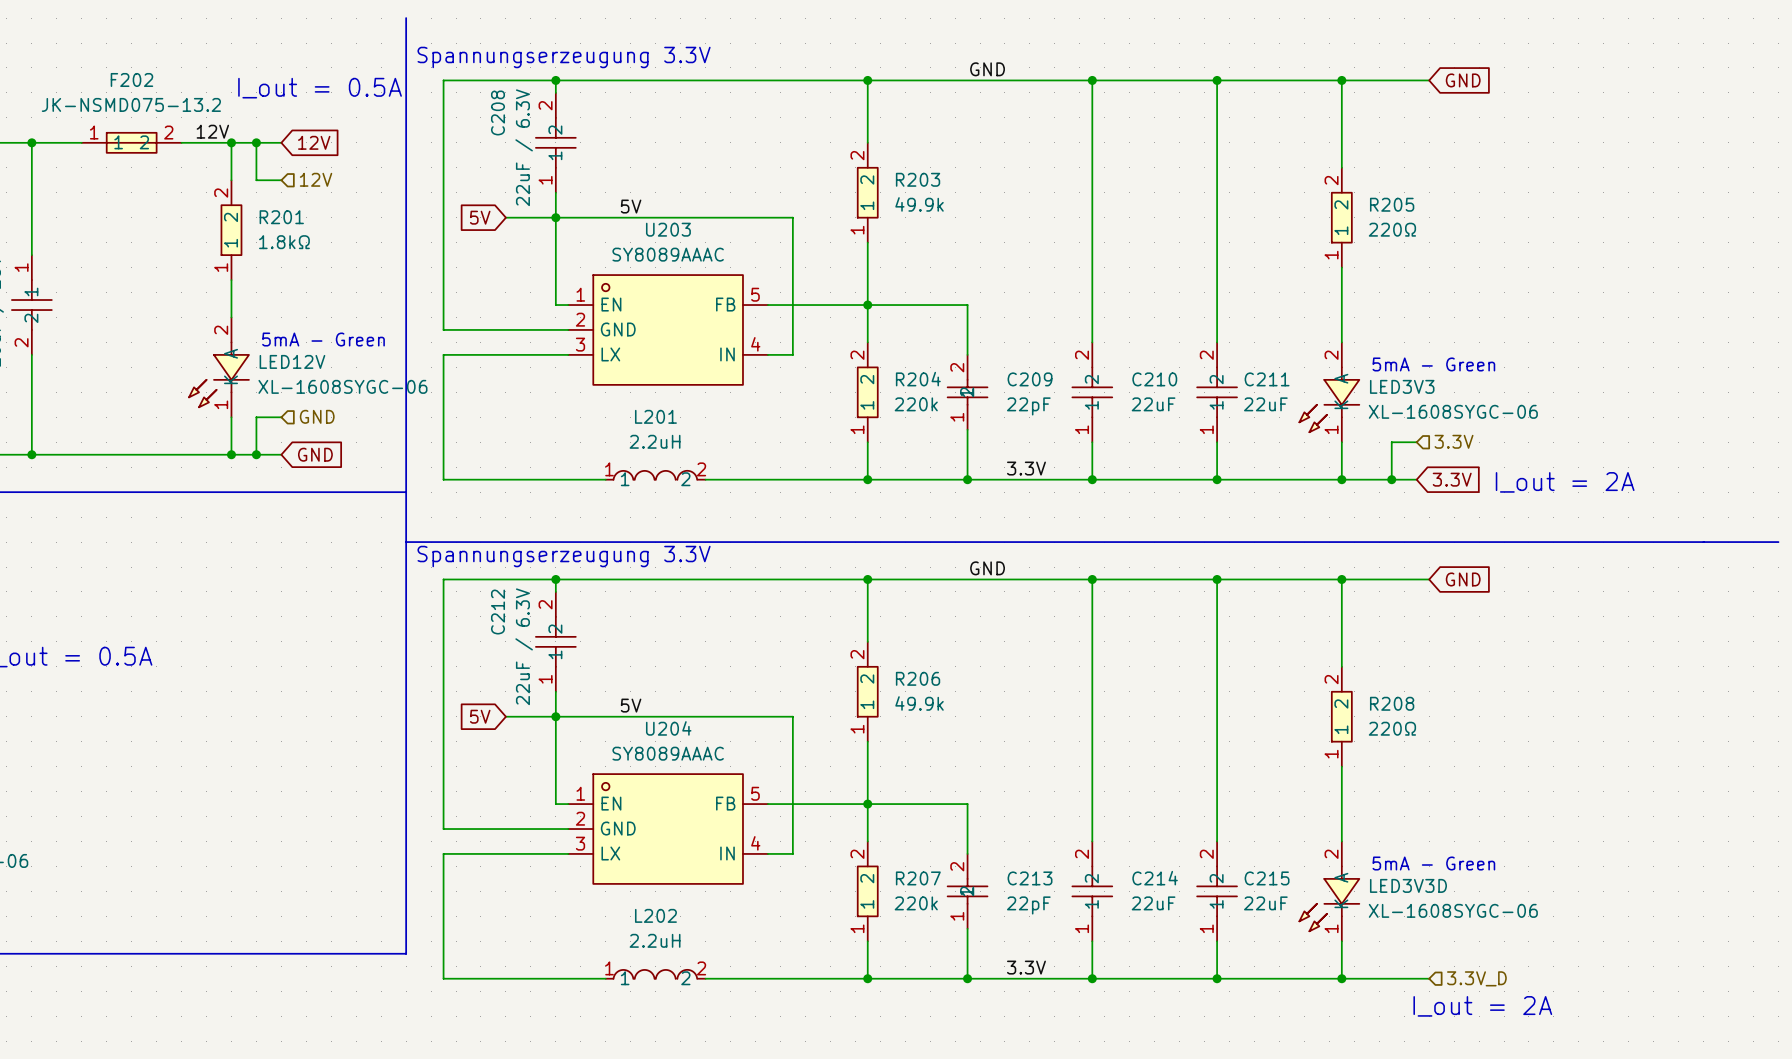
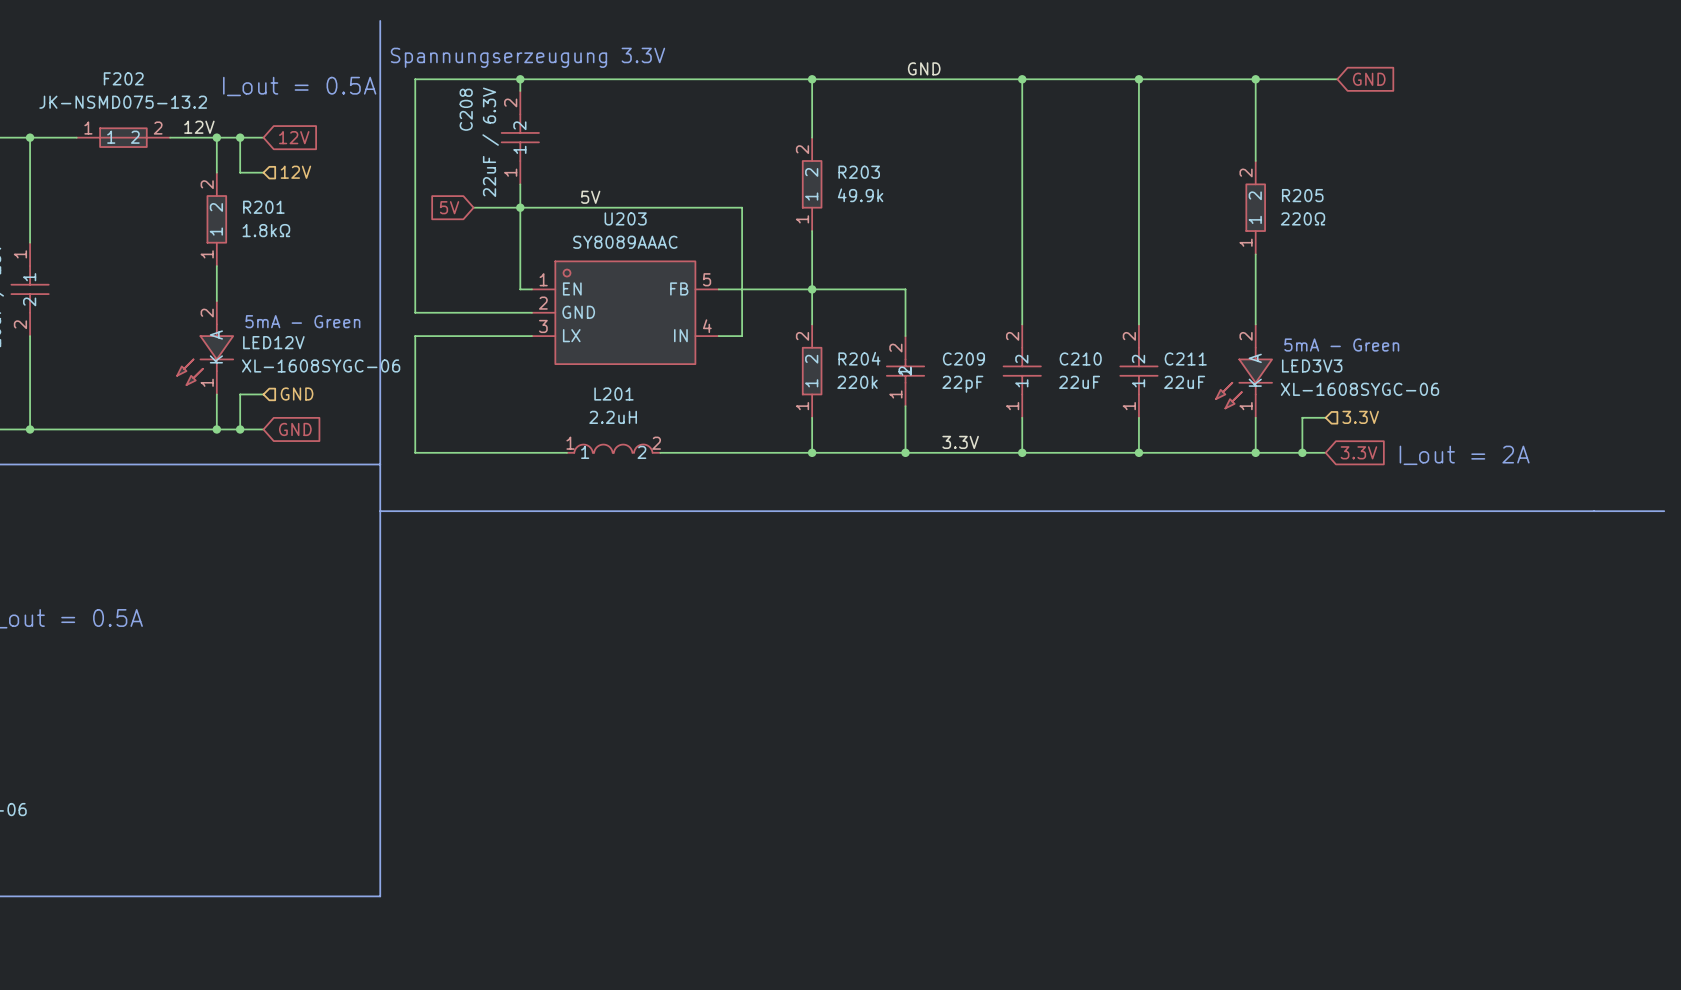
text: Spannungserzeugung 3.3V (564, 556) -> none
label: GND (987, 568) -> none
wire: (555, 579) (555, 591) -> none
junction: (555, 579) -> none
wire: (867, 579) (867, 641) -> none
junction: (867, 579) -> none
wire: (1092, 579) (1092, 841) -> none
junction: (1092, 579) -> none
wire: (1217, 579) (1217, 841) -> none
junction: (1217, 579) -> none
wire: (1341, 579) (1341, 666) -> none
junction: (1341, 579) -> none
wire: (1429, 579) (443, 579) (443, 829) (568, 829) -> none
global label: GND (1463, 579) -> none
C212: 22uF / 6.3V (555, 641) -> none
wire: (555, 691) (555, 804) (568, 804) -> none
R206: 49.9k (867, 691) -> none
label: 5V (631, 705) -> none
global label: 5V (480, 716) -> none
wire: (505, 716) (792, 716) (792, 853) (767, 853) -> none
junction: (555, 716) -> none
R208: 220Ω (1341, 716) -> none
wire: (867, 741) (867, 841) -> none
wire: (1341, 766) (1341, 841) -> none
wire: (767, 804) (967, 804) (967, 853) -> none
junction: (867, 804) -> none
U204: SY8089AAAC (668, 829) -> none
wire: (568, 853) (443, 853) (443, 978) (605, 978) -> none
text: 5mA - Green (1433, 863) -> none
R207: 220k (867, 891) -> none
C213: 22pF (967, 891) -> none
C214: 22uF (1092, 891) -> none
C215: 22uF (1217, 891) -> none
LED3V3D: XL-1608SYGC-06 (1329, 891) -> none
wire: (967, 928) (967, 978) -> none
wire: (867, 941) (867, 978) -> none
wire: (1092, 941) (1092, 978) -> none
wire: (1217, 941) (1217, 978) -> none
wire: (1341, 941) (1341, 978) -> none
label: 3.3V (1026, 967) -> none
L202: 2.2uH (655, 974) -> none
wire: (705, 978) (1429, 978) -> none
junction: (867, 978) -> none
junction: (967, 978) -> none
junction: (1092, 978) -> none
junction: (1217, 978) -> none
junction: (1341, 978) -> none
hierarchical label: 3.3V_D (1476, 978) -> none
text: I_out = 2A (1482, 1006) -> none

